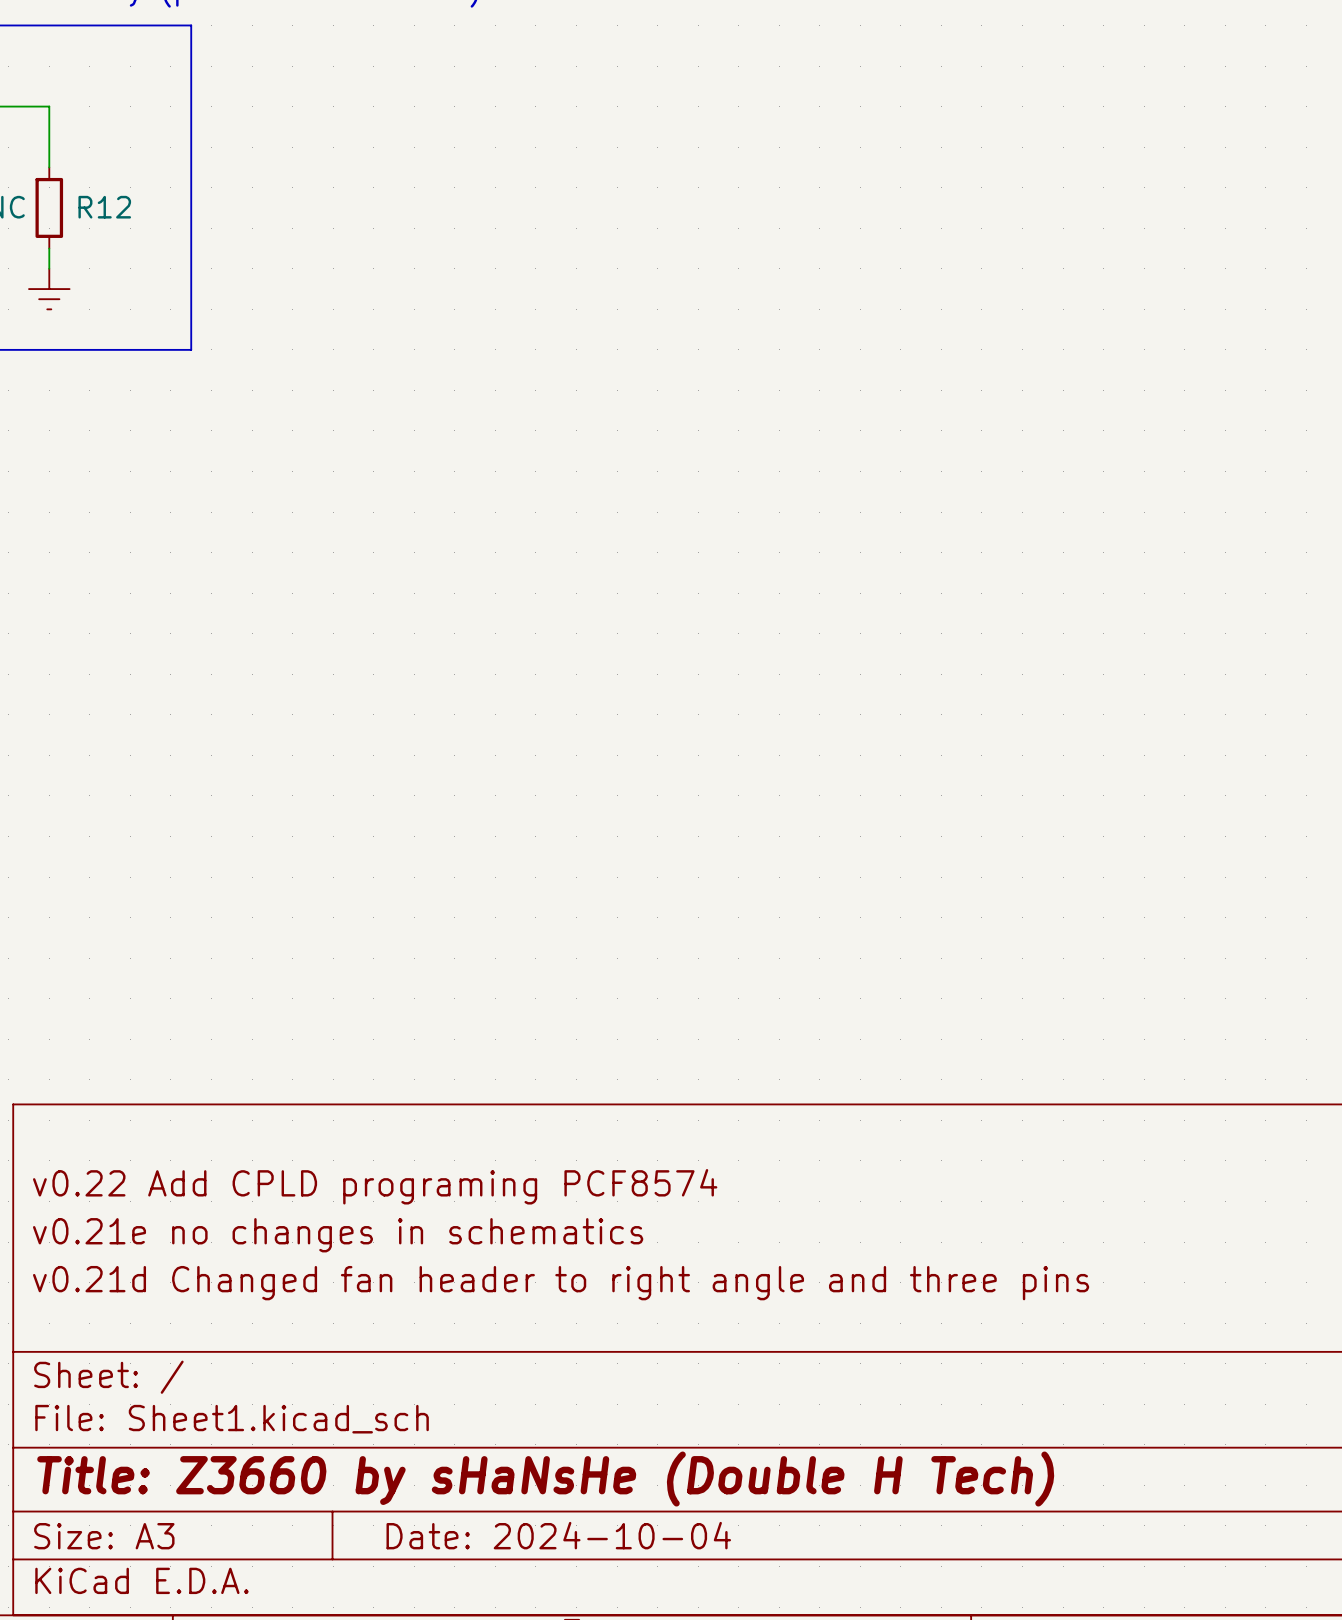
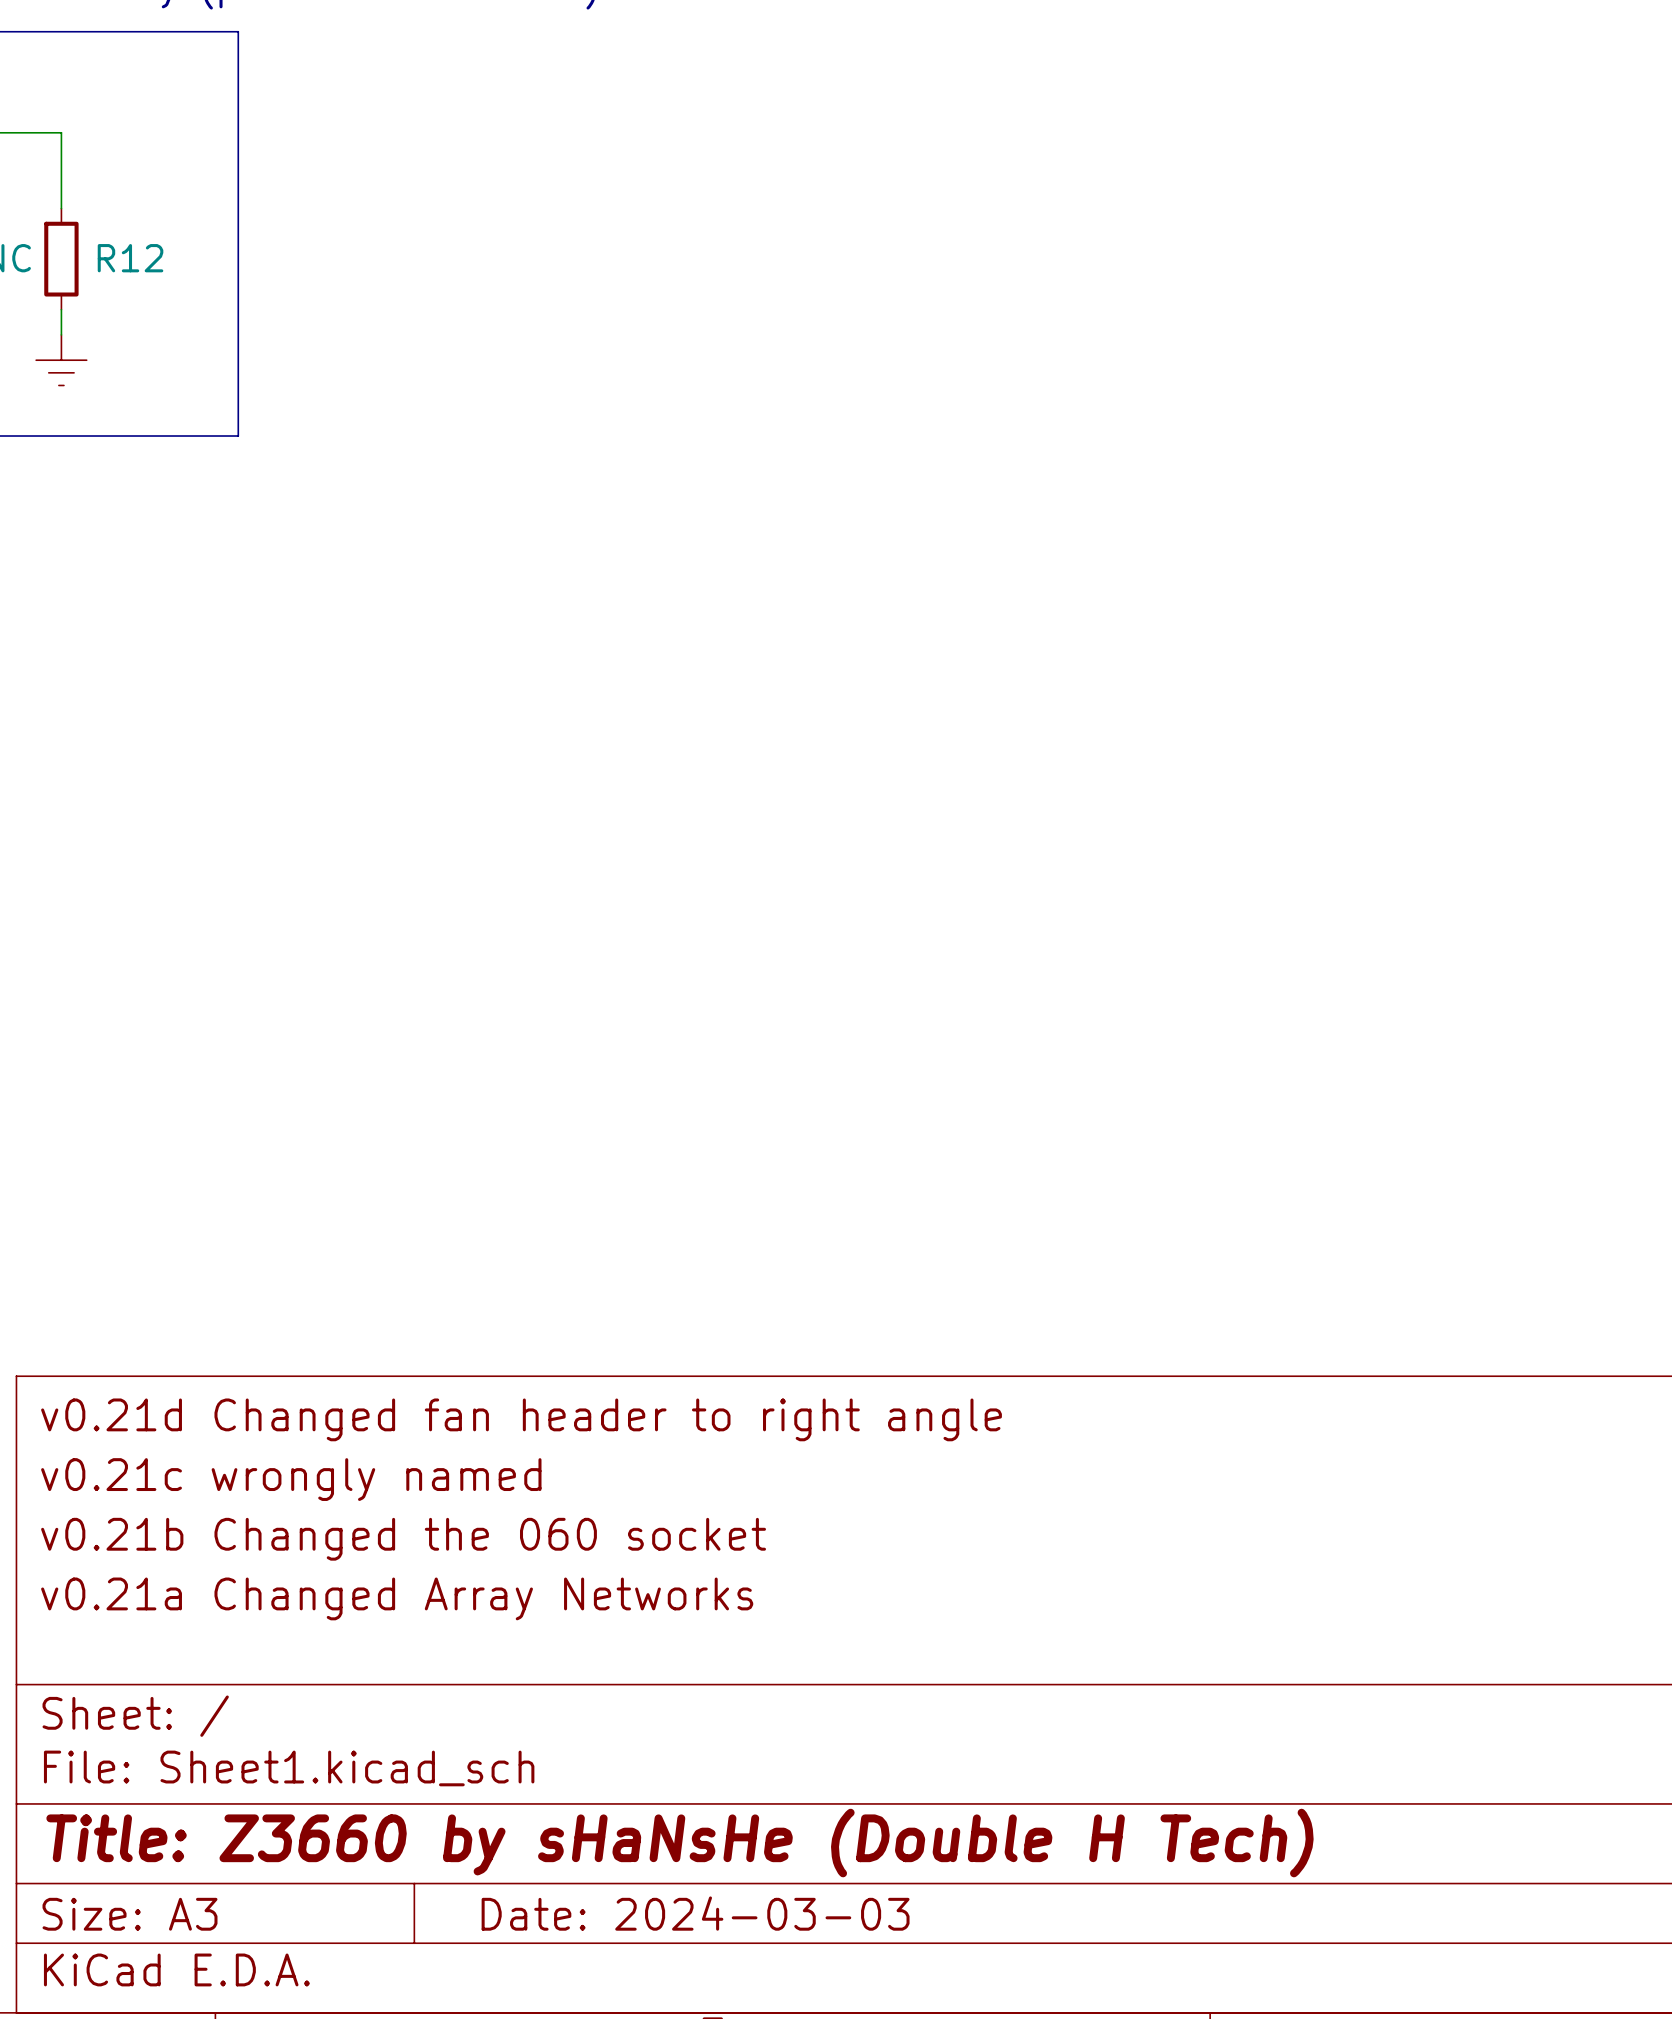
title block: none -> v0.21d Changed fan header to right angle (521, 1419)
title block: v0.22 Add CPLD programing PCF8574 (375, 1186) -> v0.21c wrongly named (291, 1479)
title block: v0.21e no changes in schematics (338, 1235) -> v0.21b Changed the 060 socket (403, 1539)
title block: v0.21d Changed fan header to right angle and three pins (561, 1283) -> v0.21a Changed Array Networks (397, 1598)
title block: Date: 2024-10-04 (558, 1535) -> Date: 2024-03-03 (695, 1913)

